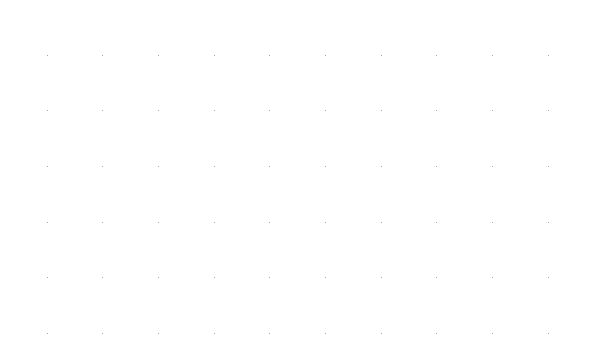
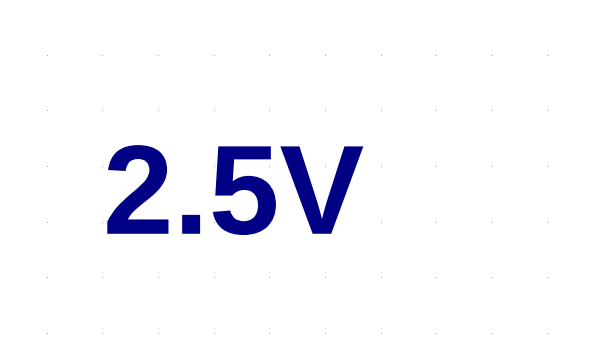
text: none -> 2.5V (235, 190)

